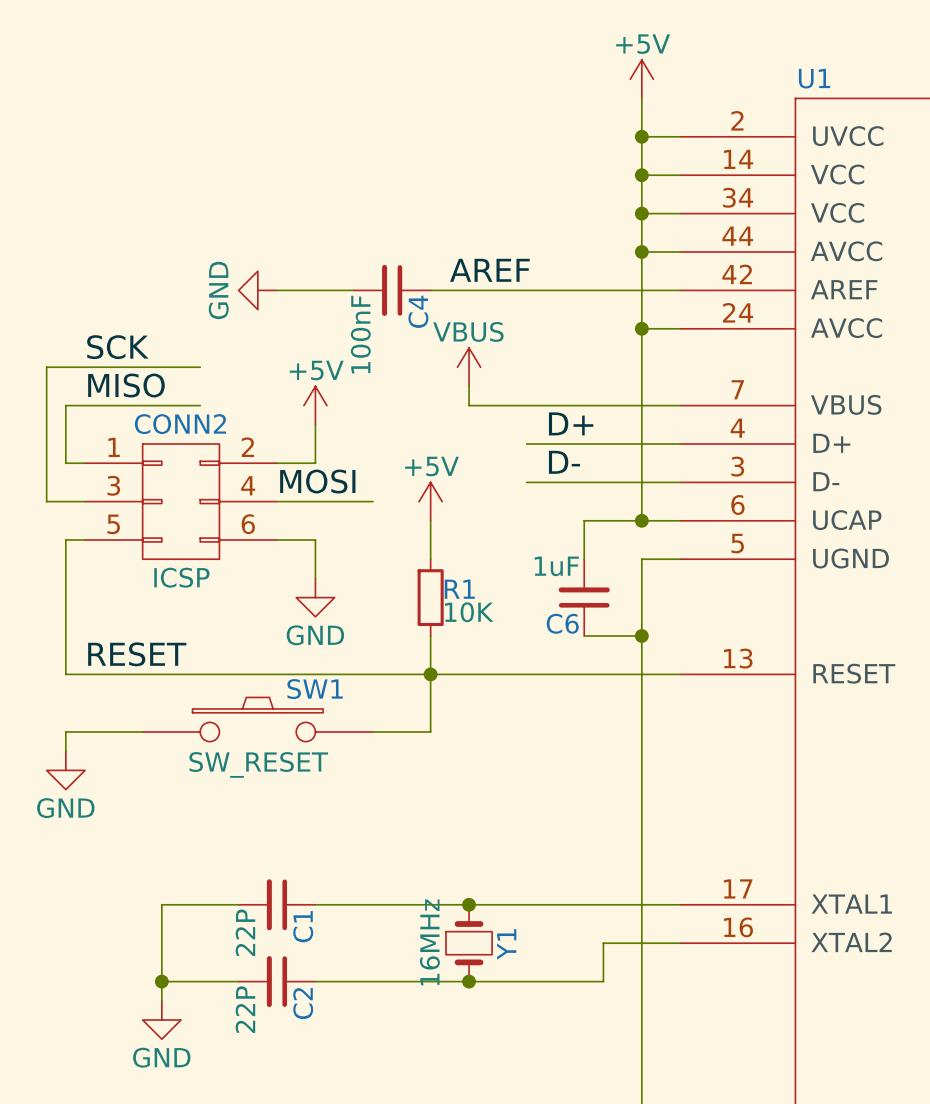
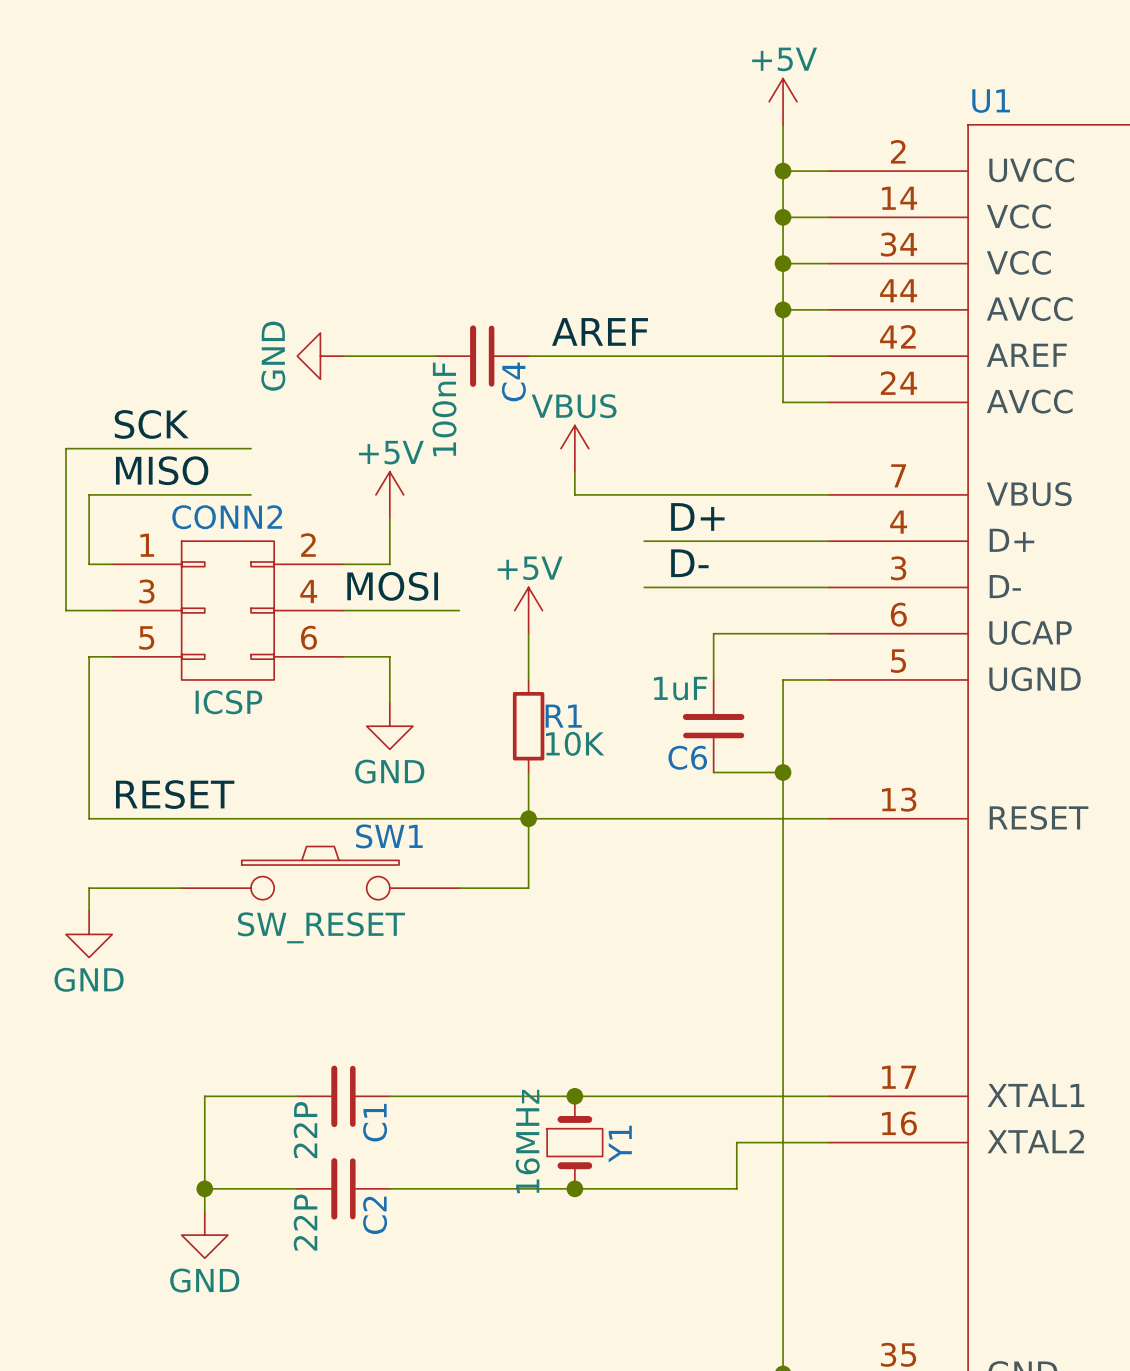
wire: (641, 328) (641, 520) -> none
junction: (641, 328) -> none
junction: (641, 520) -> none

